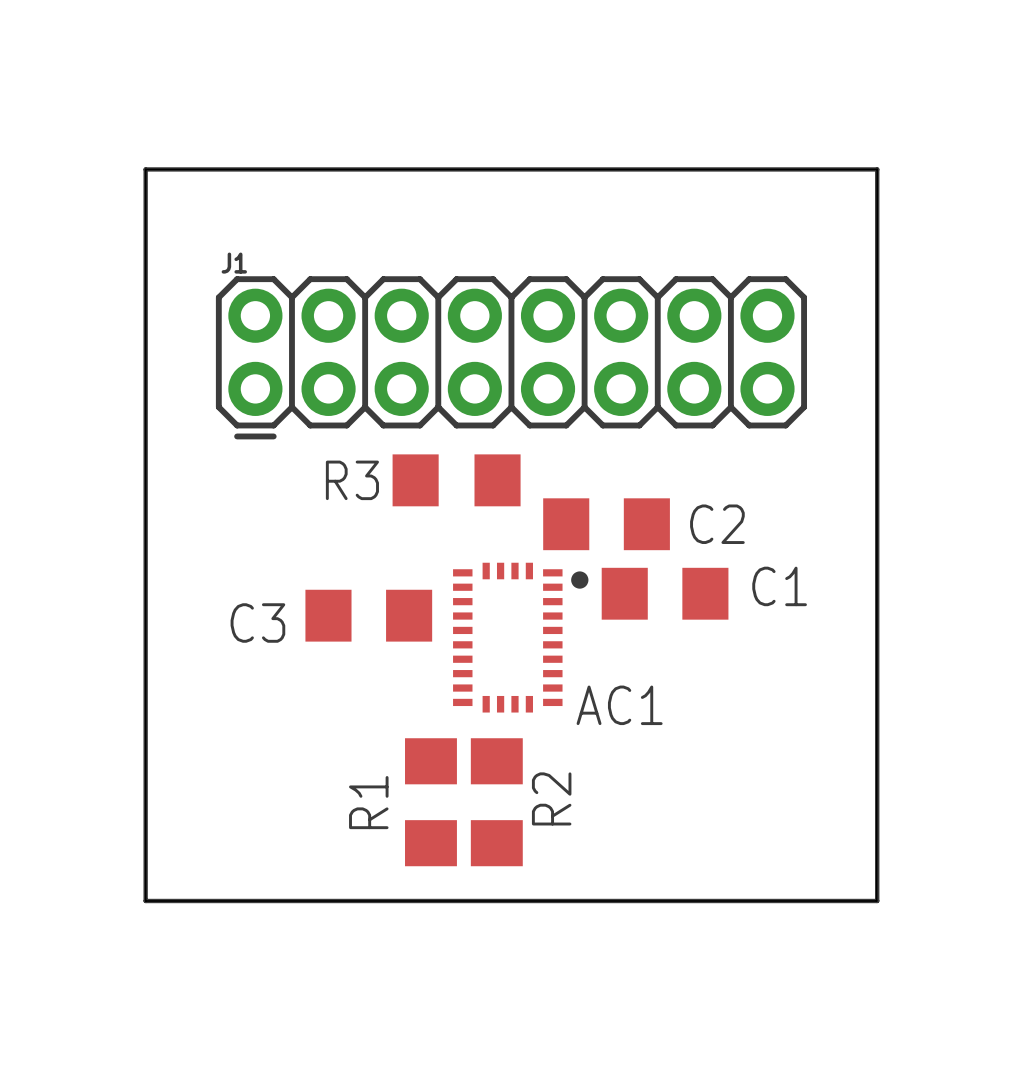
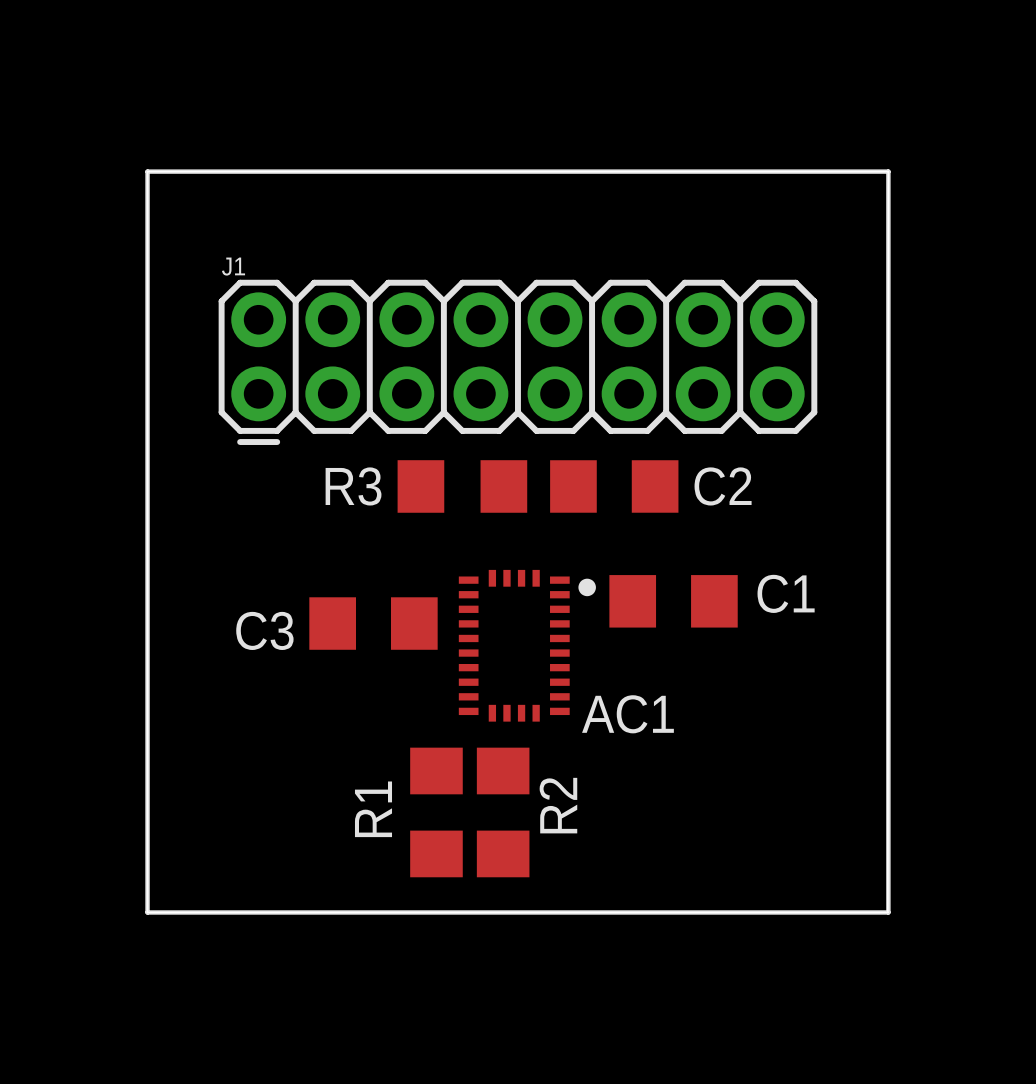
C2 position: (606, 524) -> (614, 486)

